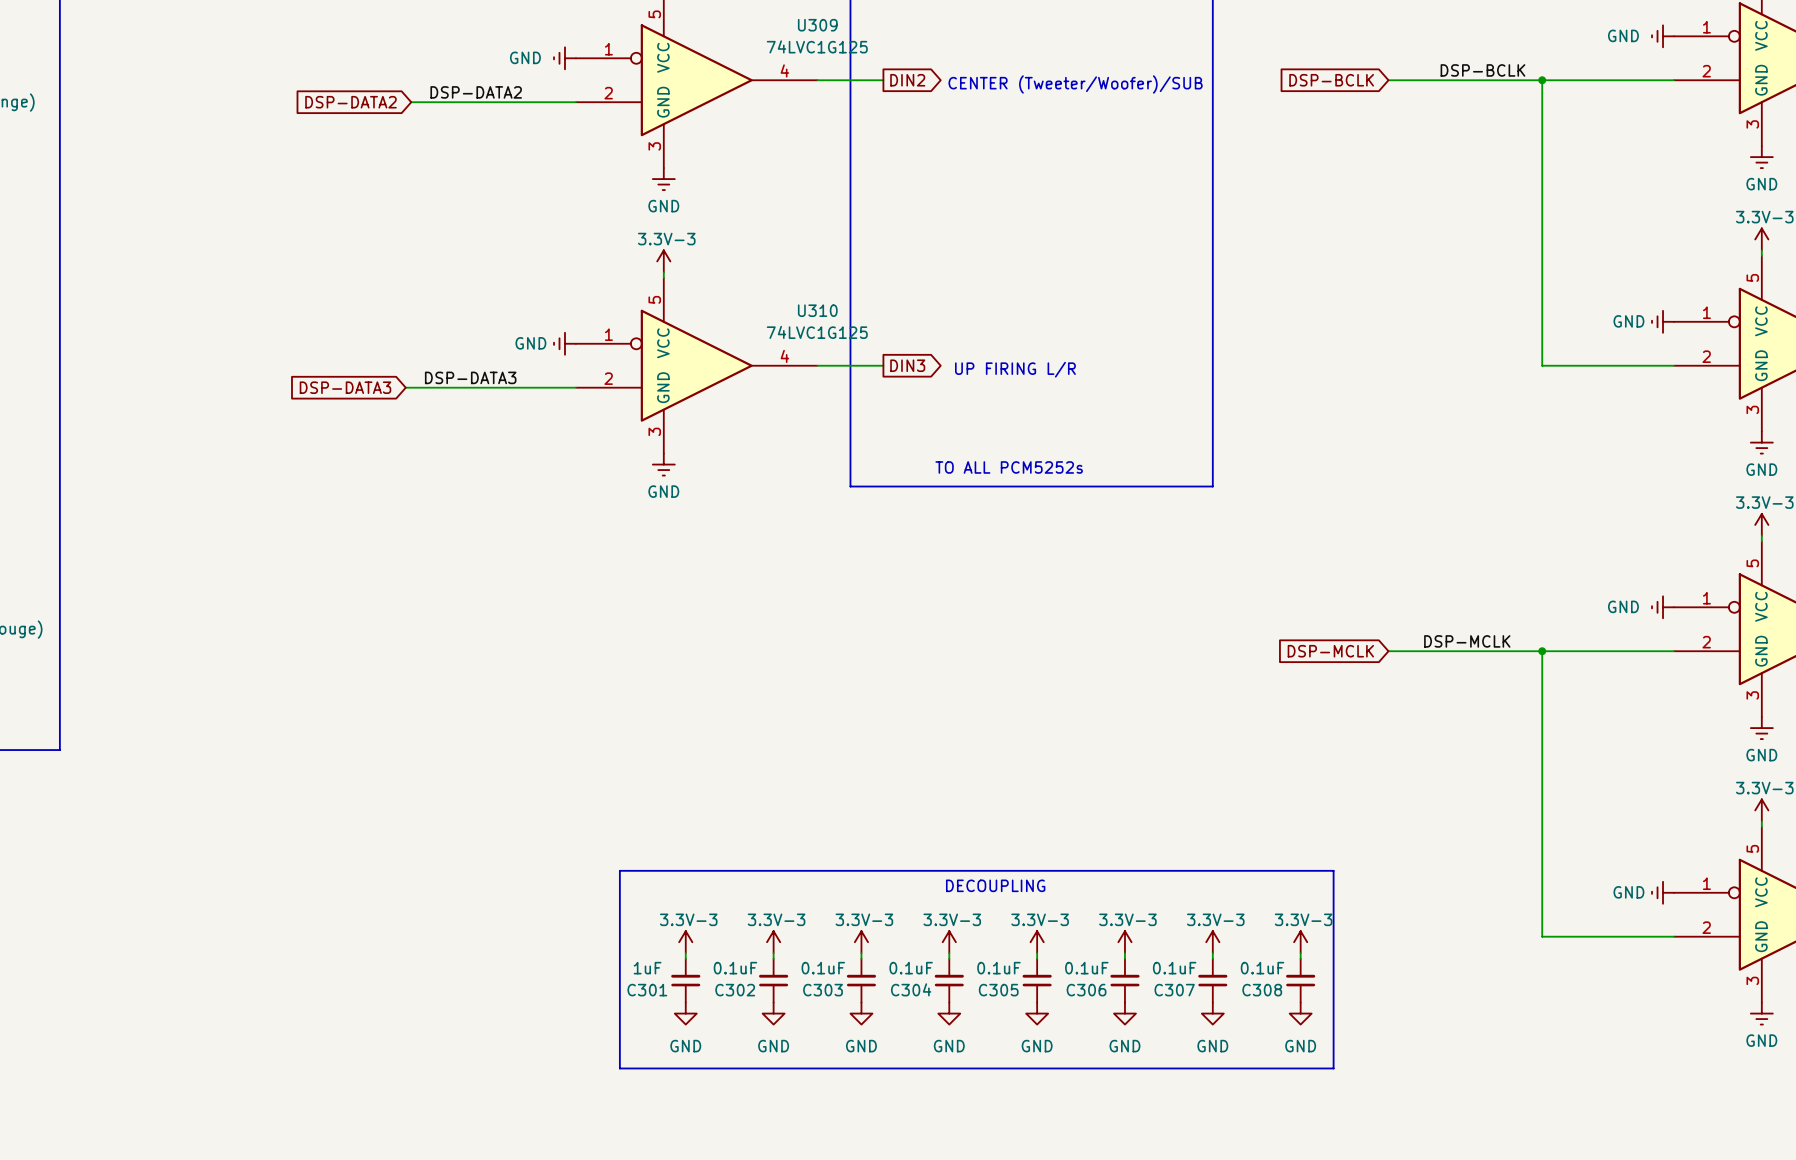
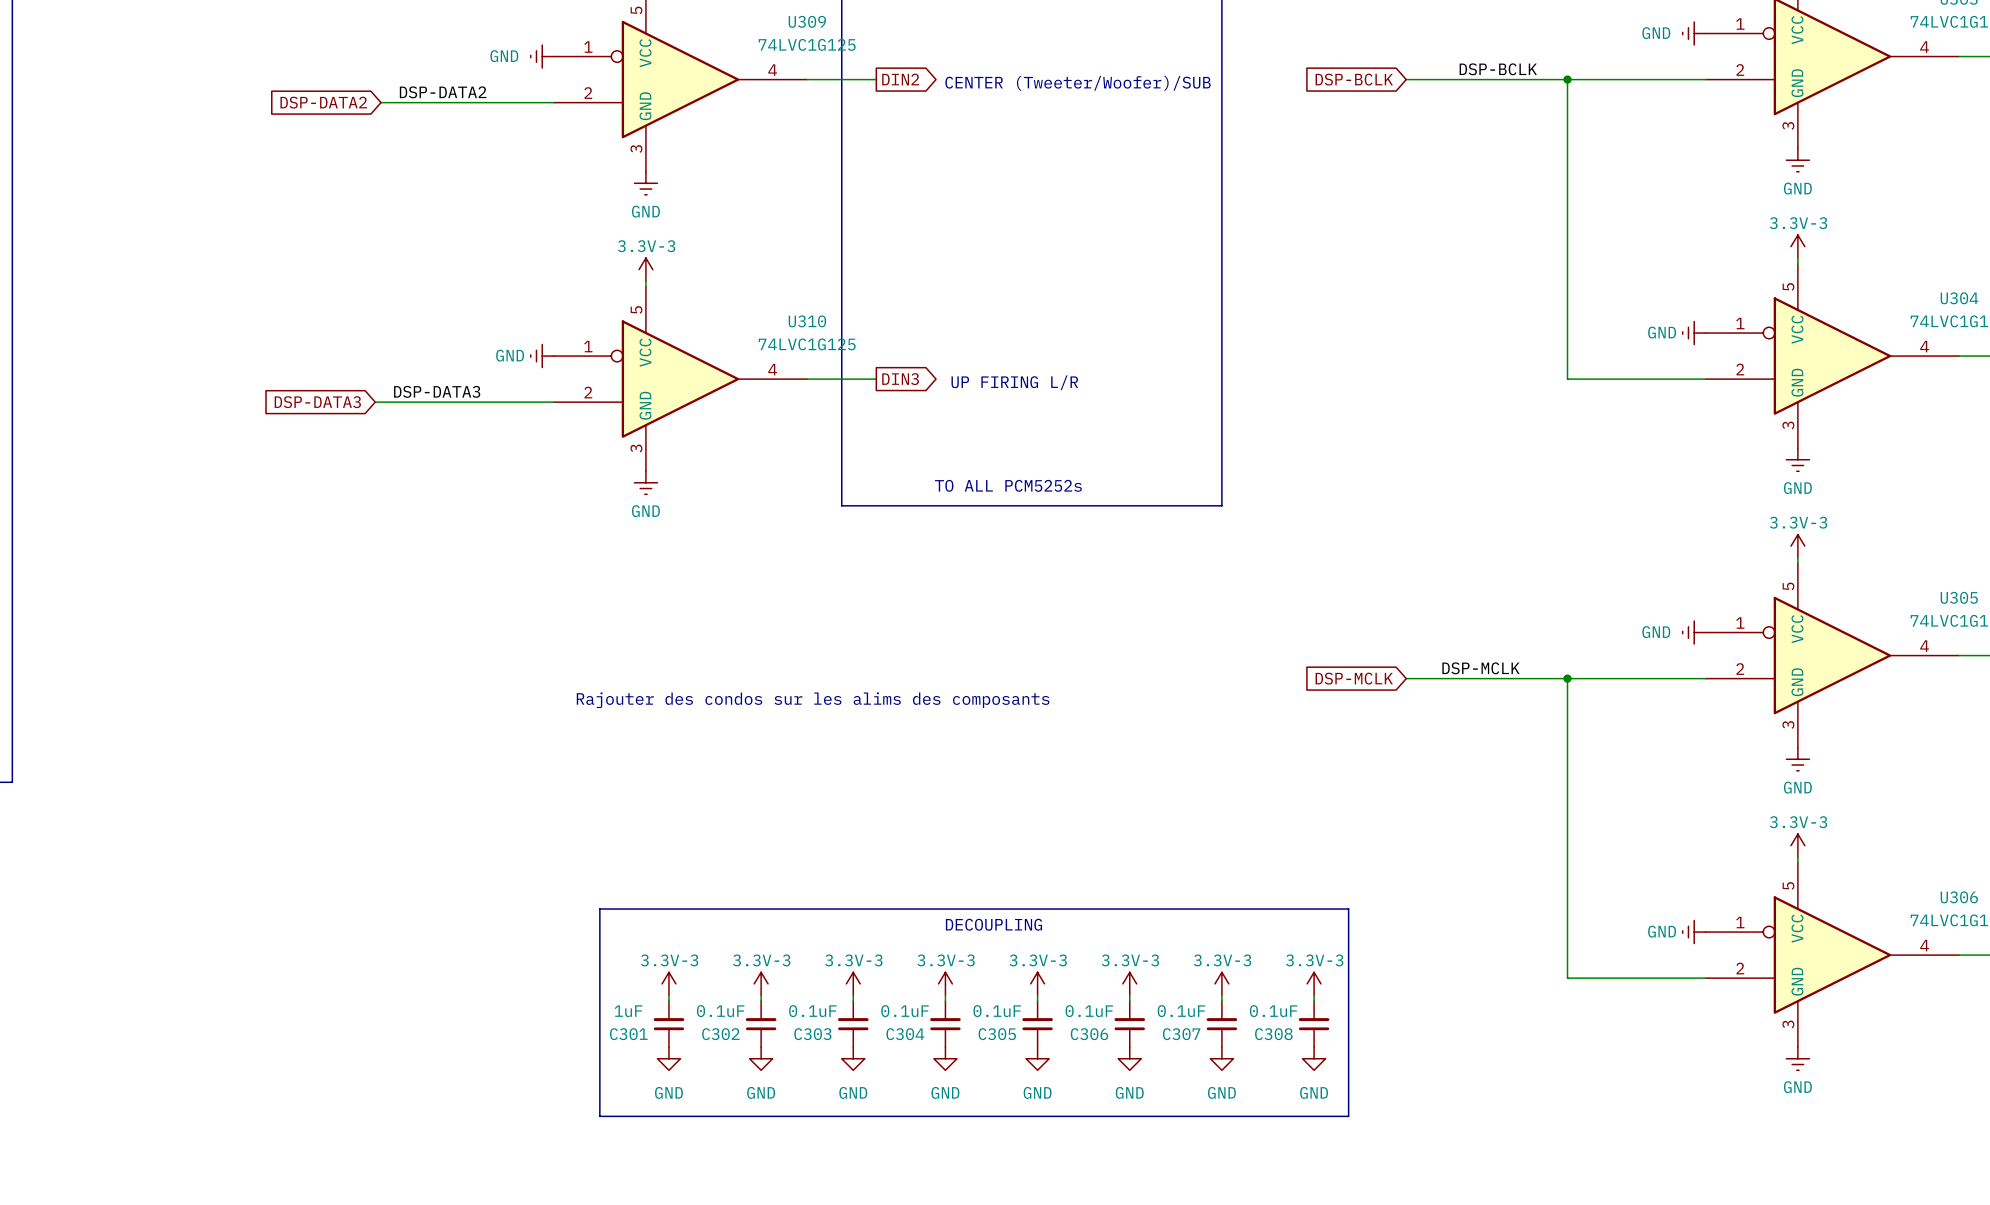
text: none -> Rajouter des condos sur les alims des composants (813, 700)

